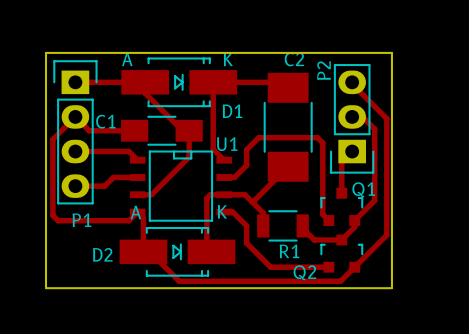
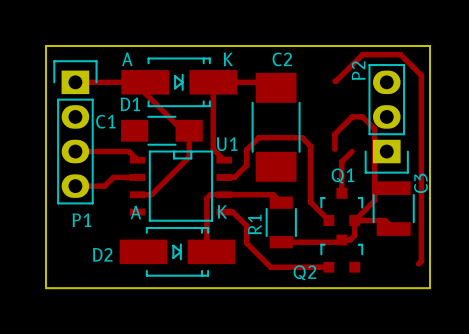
board edge: (46, 52) (391, 52) (391, 288) -> (46, 52) (46, 46) (430, 46) (430, 288) (391, 288)
top track: none -> (334, 81) (362, 54) (400, 54) (421, 75) (421, 261) (418, 263)
top track: (357, 82) (352, 82) (352, 84) (386, 118) (386, 235) (340, 281) (179, 281) (149, 251) -> none
D1 name position: D1 (232, 111) -> D1 (130, 104)
top track: none -> (352, 116) (334, 134) (334, 149)
P2 position: (352, 118) -> (386, 118)
C2 position: (288, 127) -> (276, 127)
top track: (134, 130) (89, 130) (75, 116) (52, 139) (52, 215) (58, 220) (129, 220) (137, 212) (143, 217) (143, 251) -> none
top track: (302, 137) (317, 137) (322, 142) (322, 214) -> (302, 137) (310, 146) (310, 202) (322, 214)
top track: (288, 166) (251, 201) -> none
Q1 name position: Q1 (363, 189) -> Q1 (342, 175)
top track: (244, 194) (263, 213) (263, 225) -> (244, 194) (273, 194) (281, 202)
C3: none -> (393, 208)
top track: none -> (354, 220) (385, 220) (393, 229)
R1 rotation: 0° (282, 225) -> 90° clockwise (281, 222)
top track: (302, 225) (302, 228) (314, 239) (341, 239) (354, 227) -> (281, 242) (339, 242) (341, 239) (350, 239) (354, 235) (354, 227)

